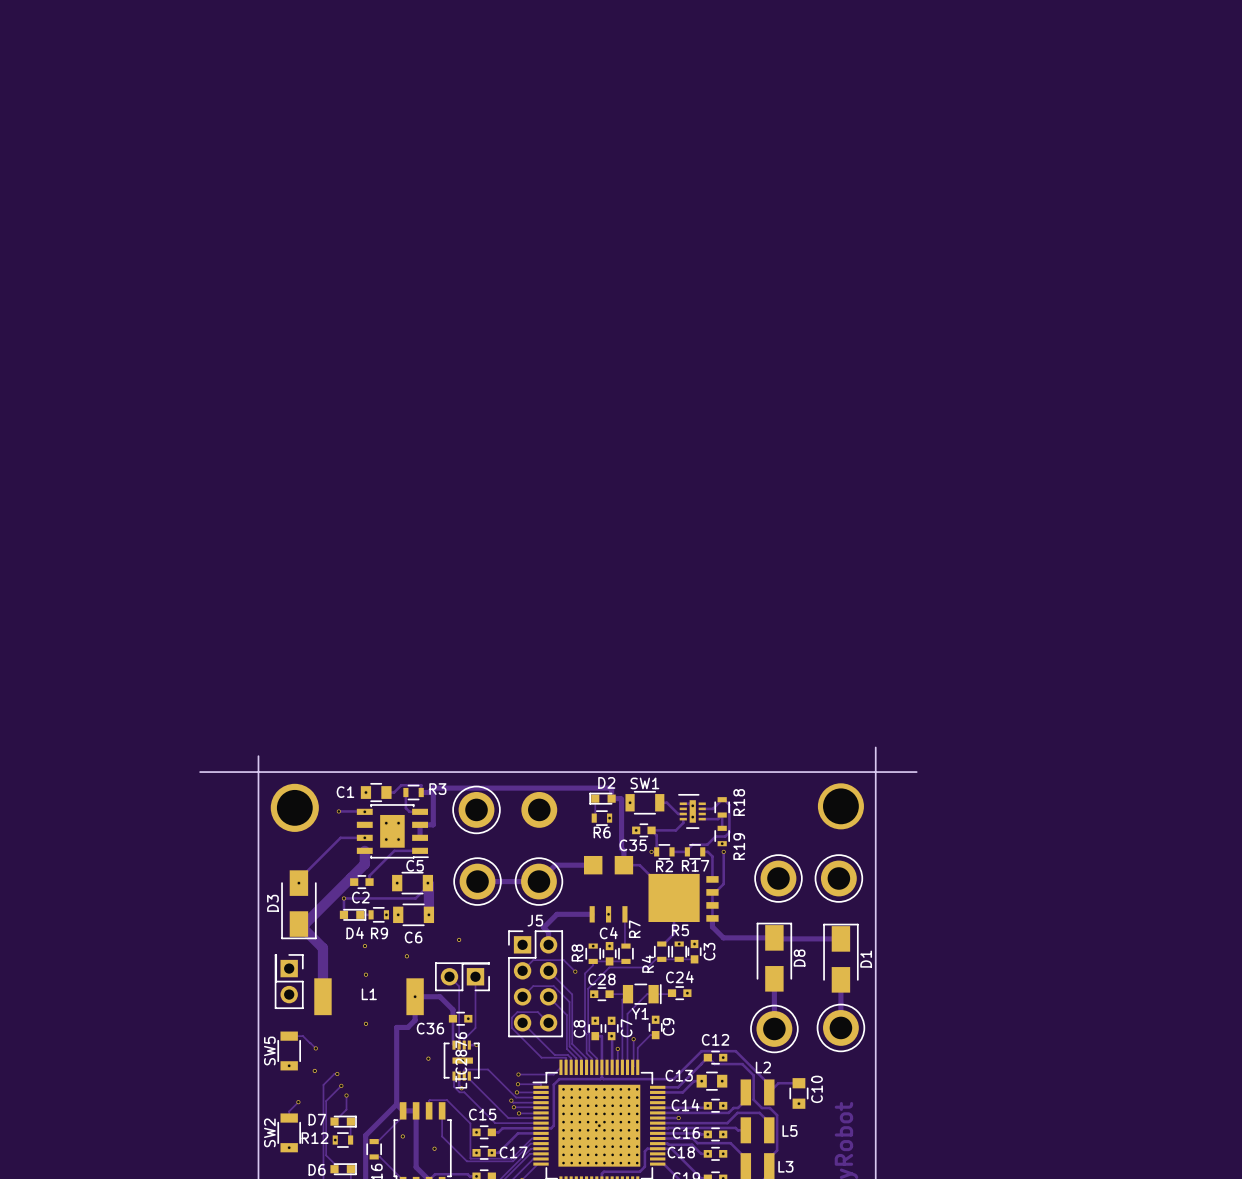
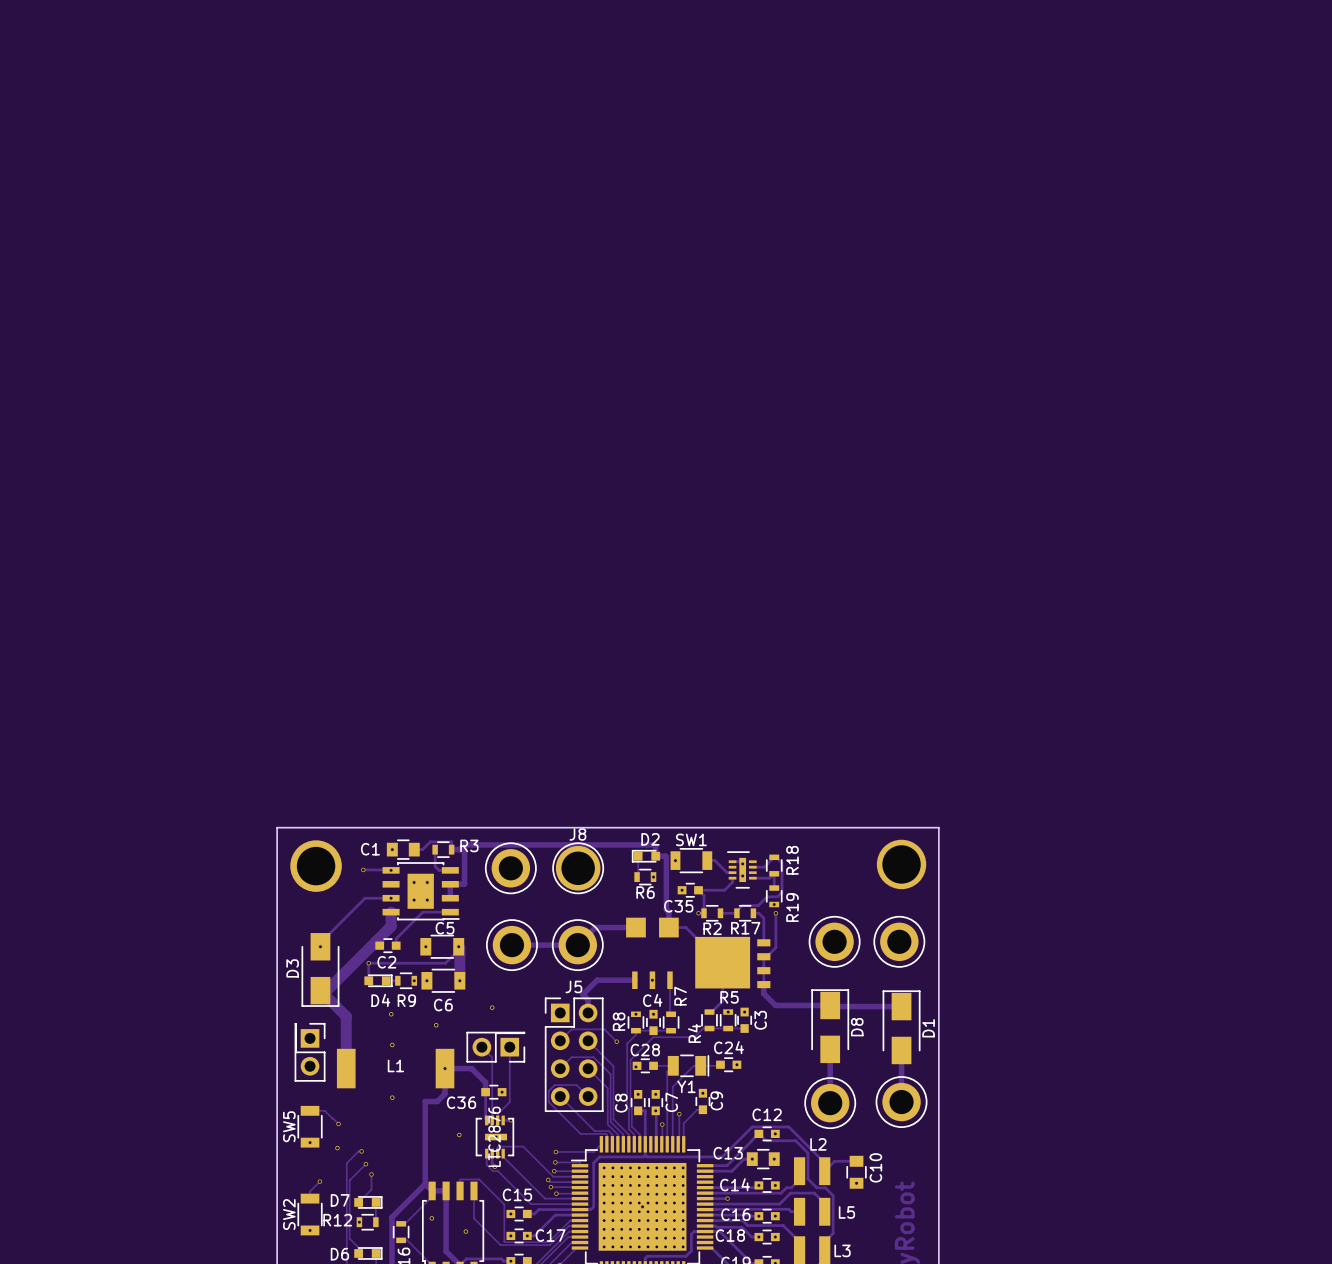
board edge: (875, 747) (875, 772) (916, 772) -> none
board edge: (258, 756) (258, 772) (200, 772) -> none
part: (539, 809) -> none
J8: none -> (578, 868)

